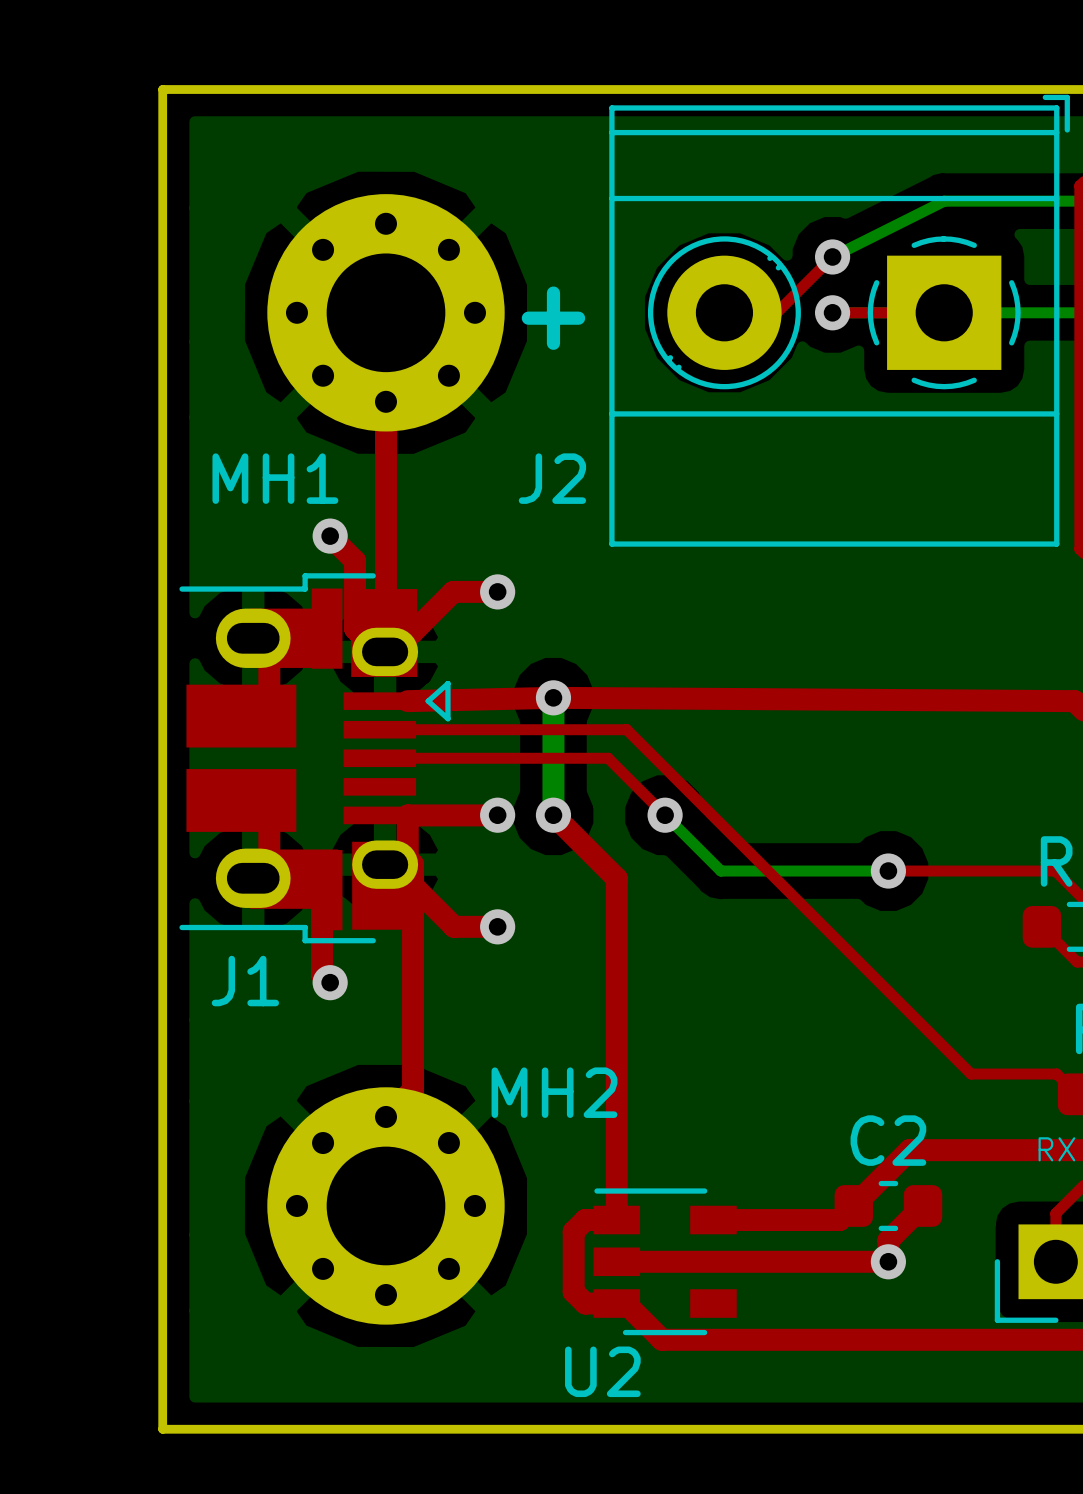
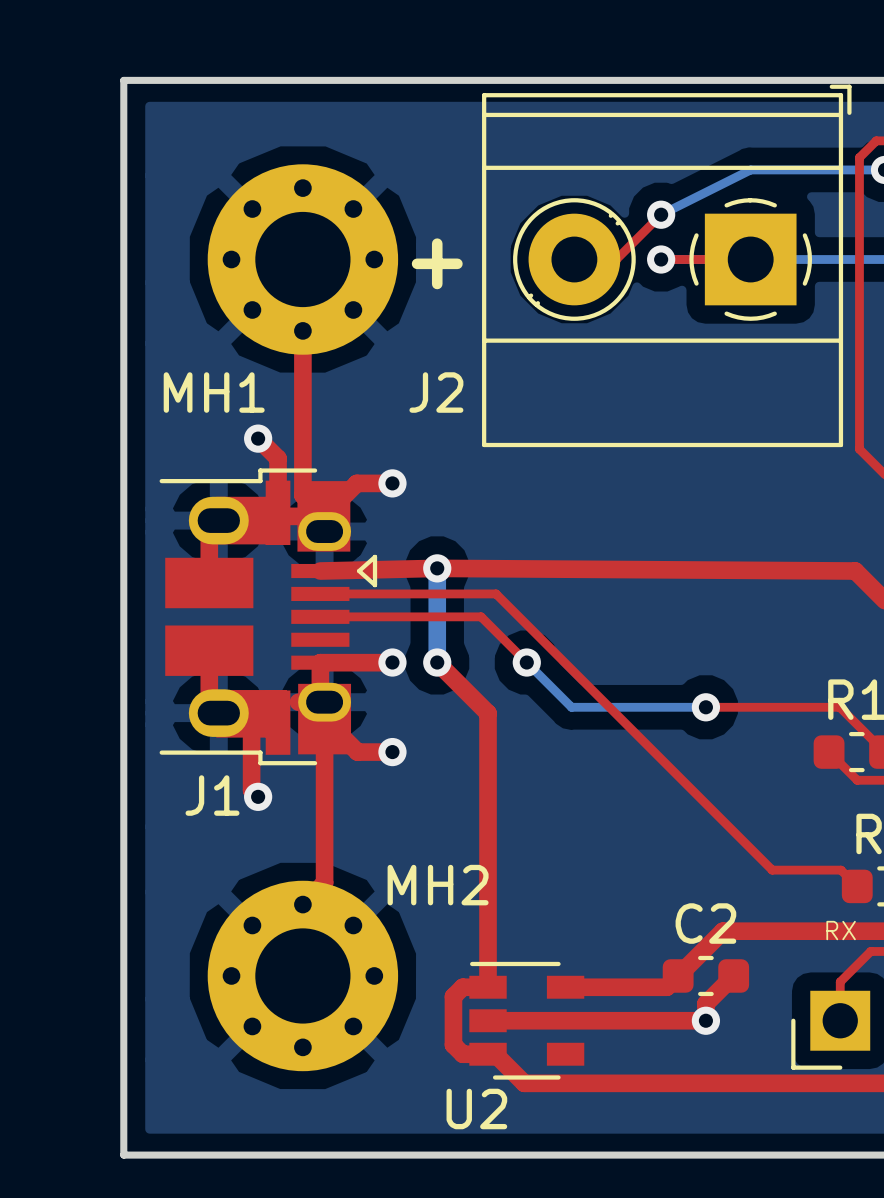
J1 position: (315, 758) -> (268, 616)

